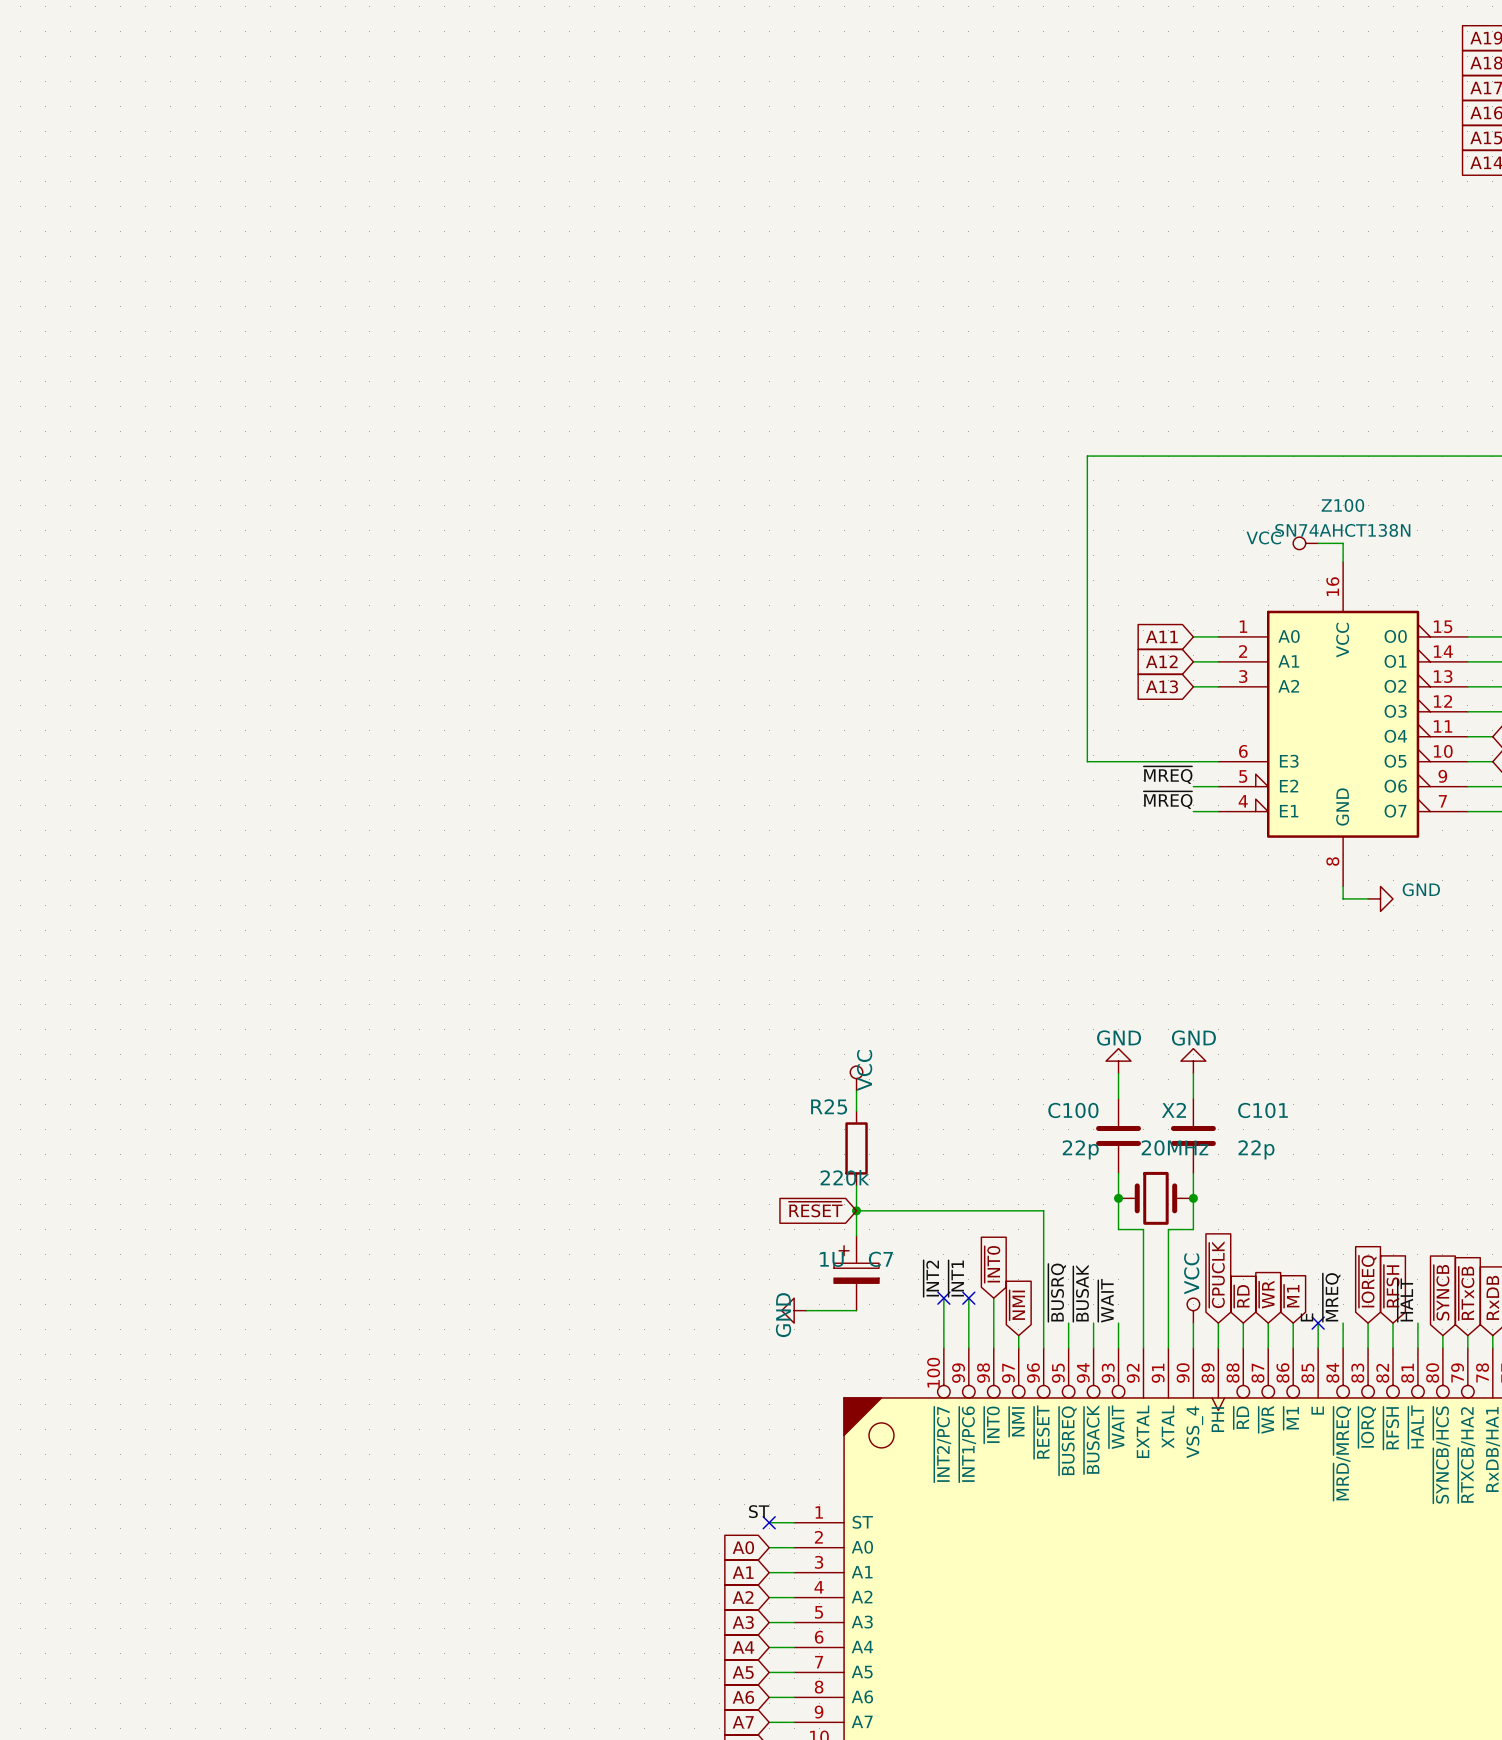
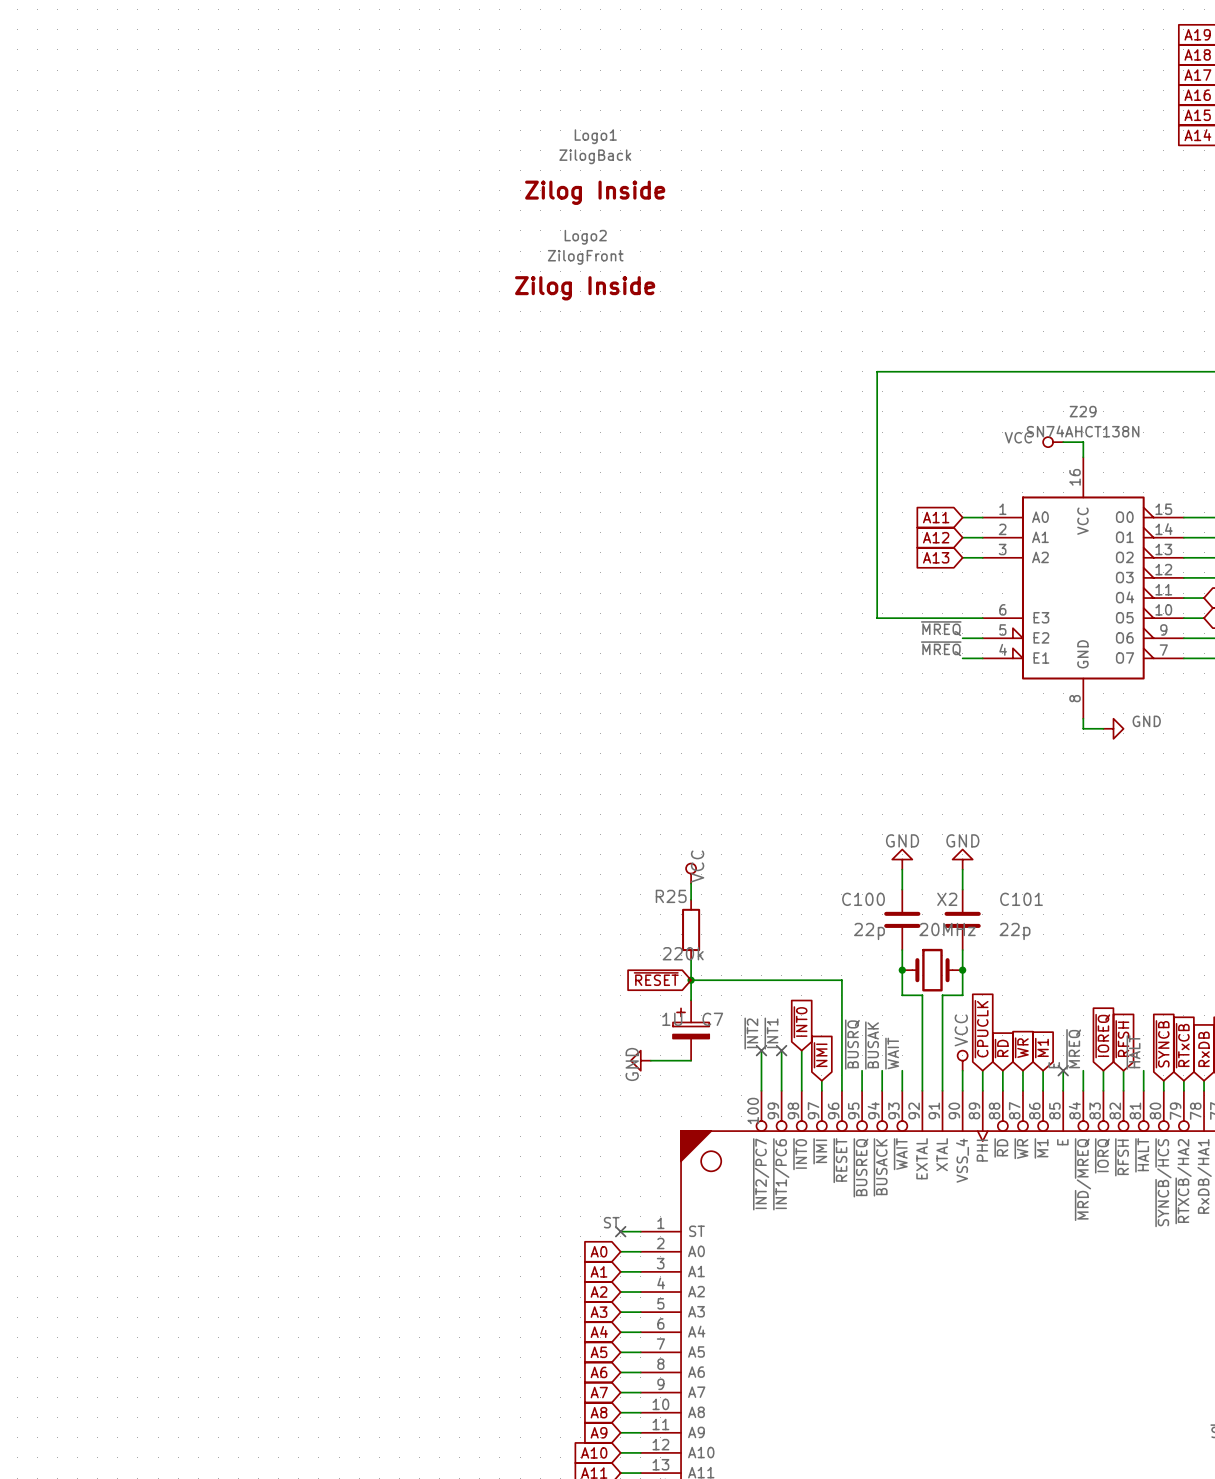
Logo1: none -> ZilogBack (595, 167)
Logo2: none -> ZilogFront (585, 265)
Z100 name: Z100 (1342, 505) -> Z29 (1083, 411)

